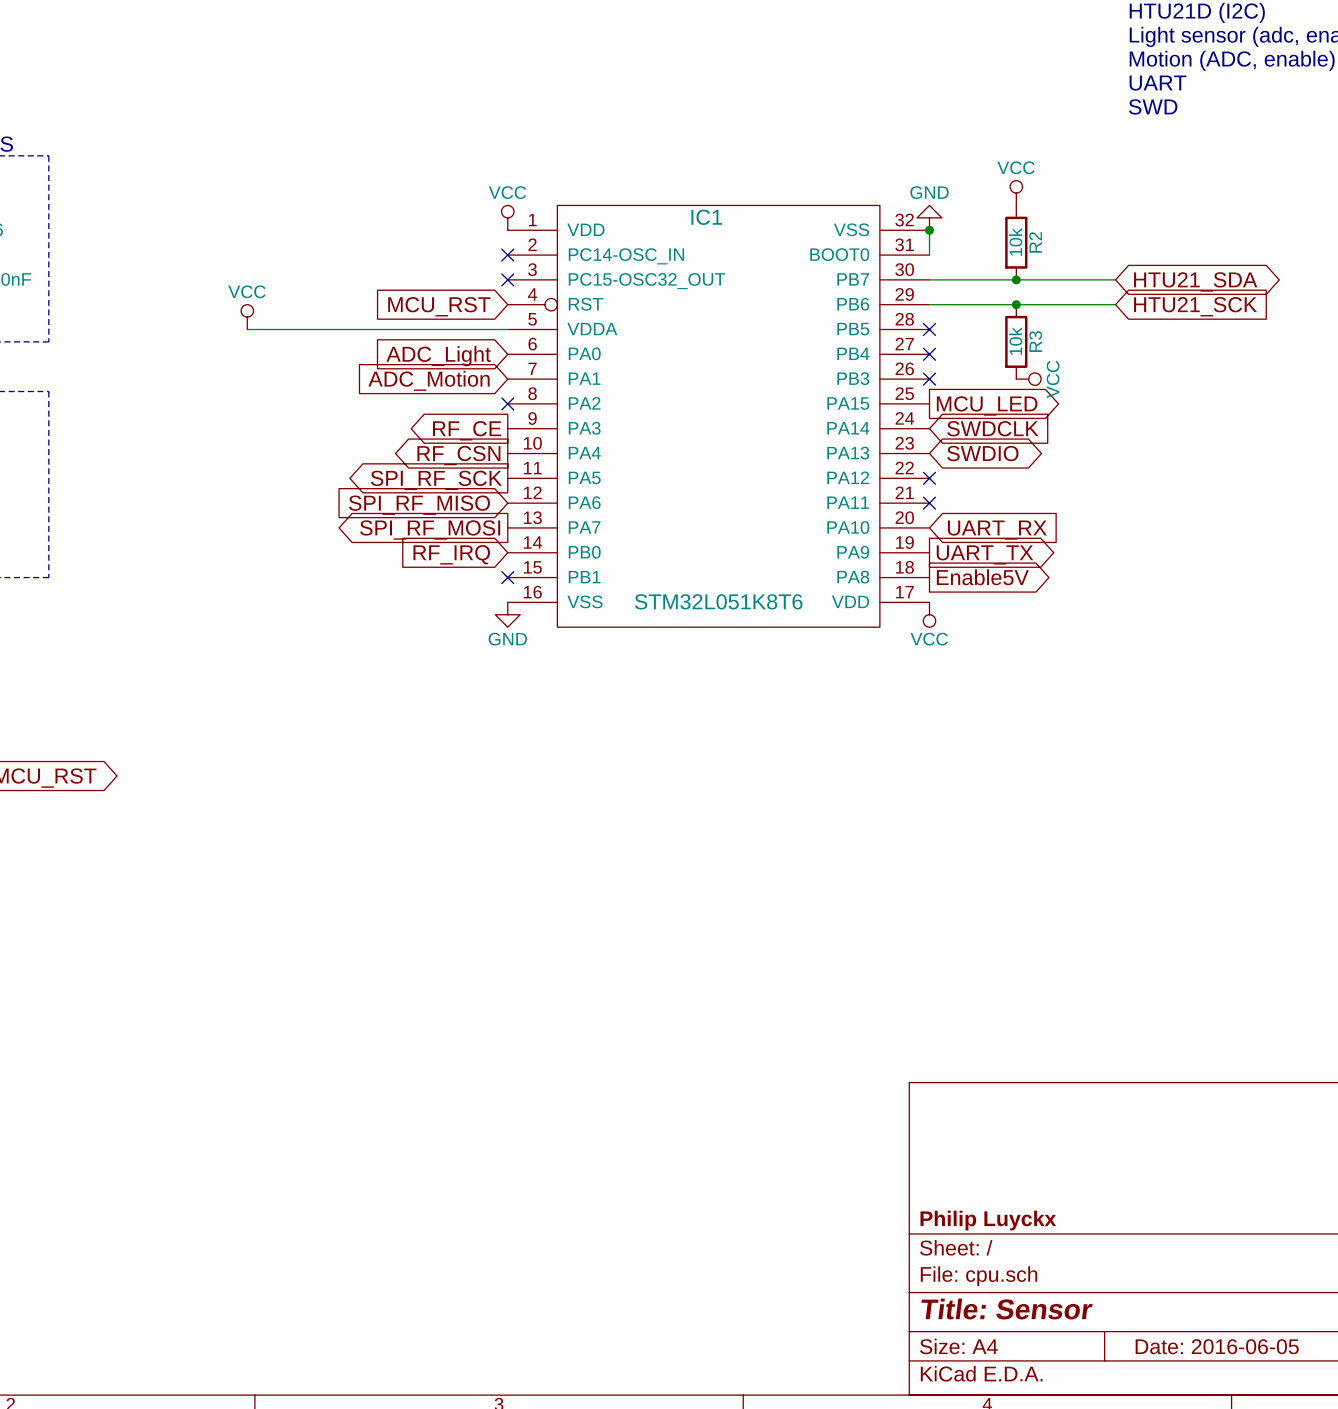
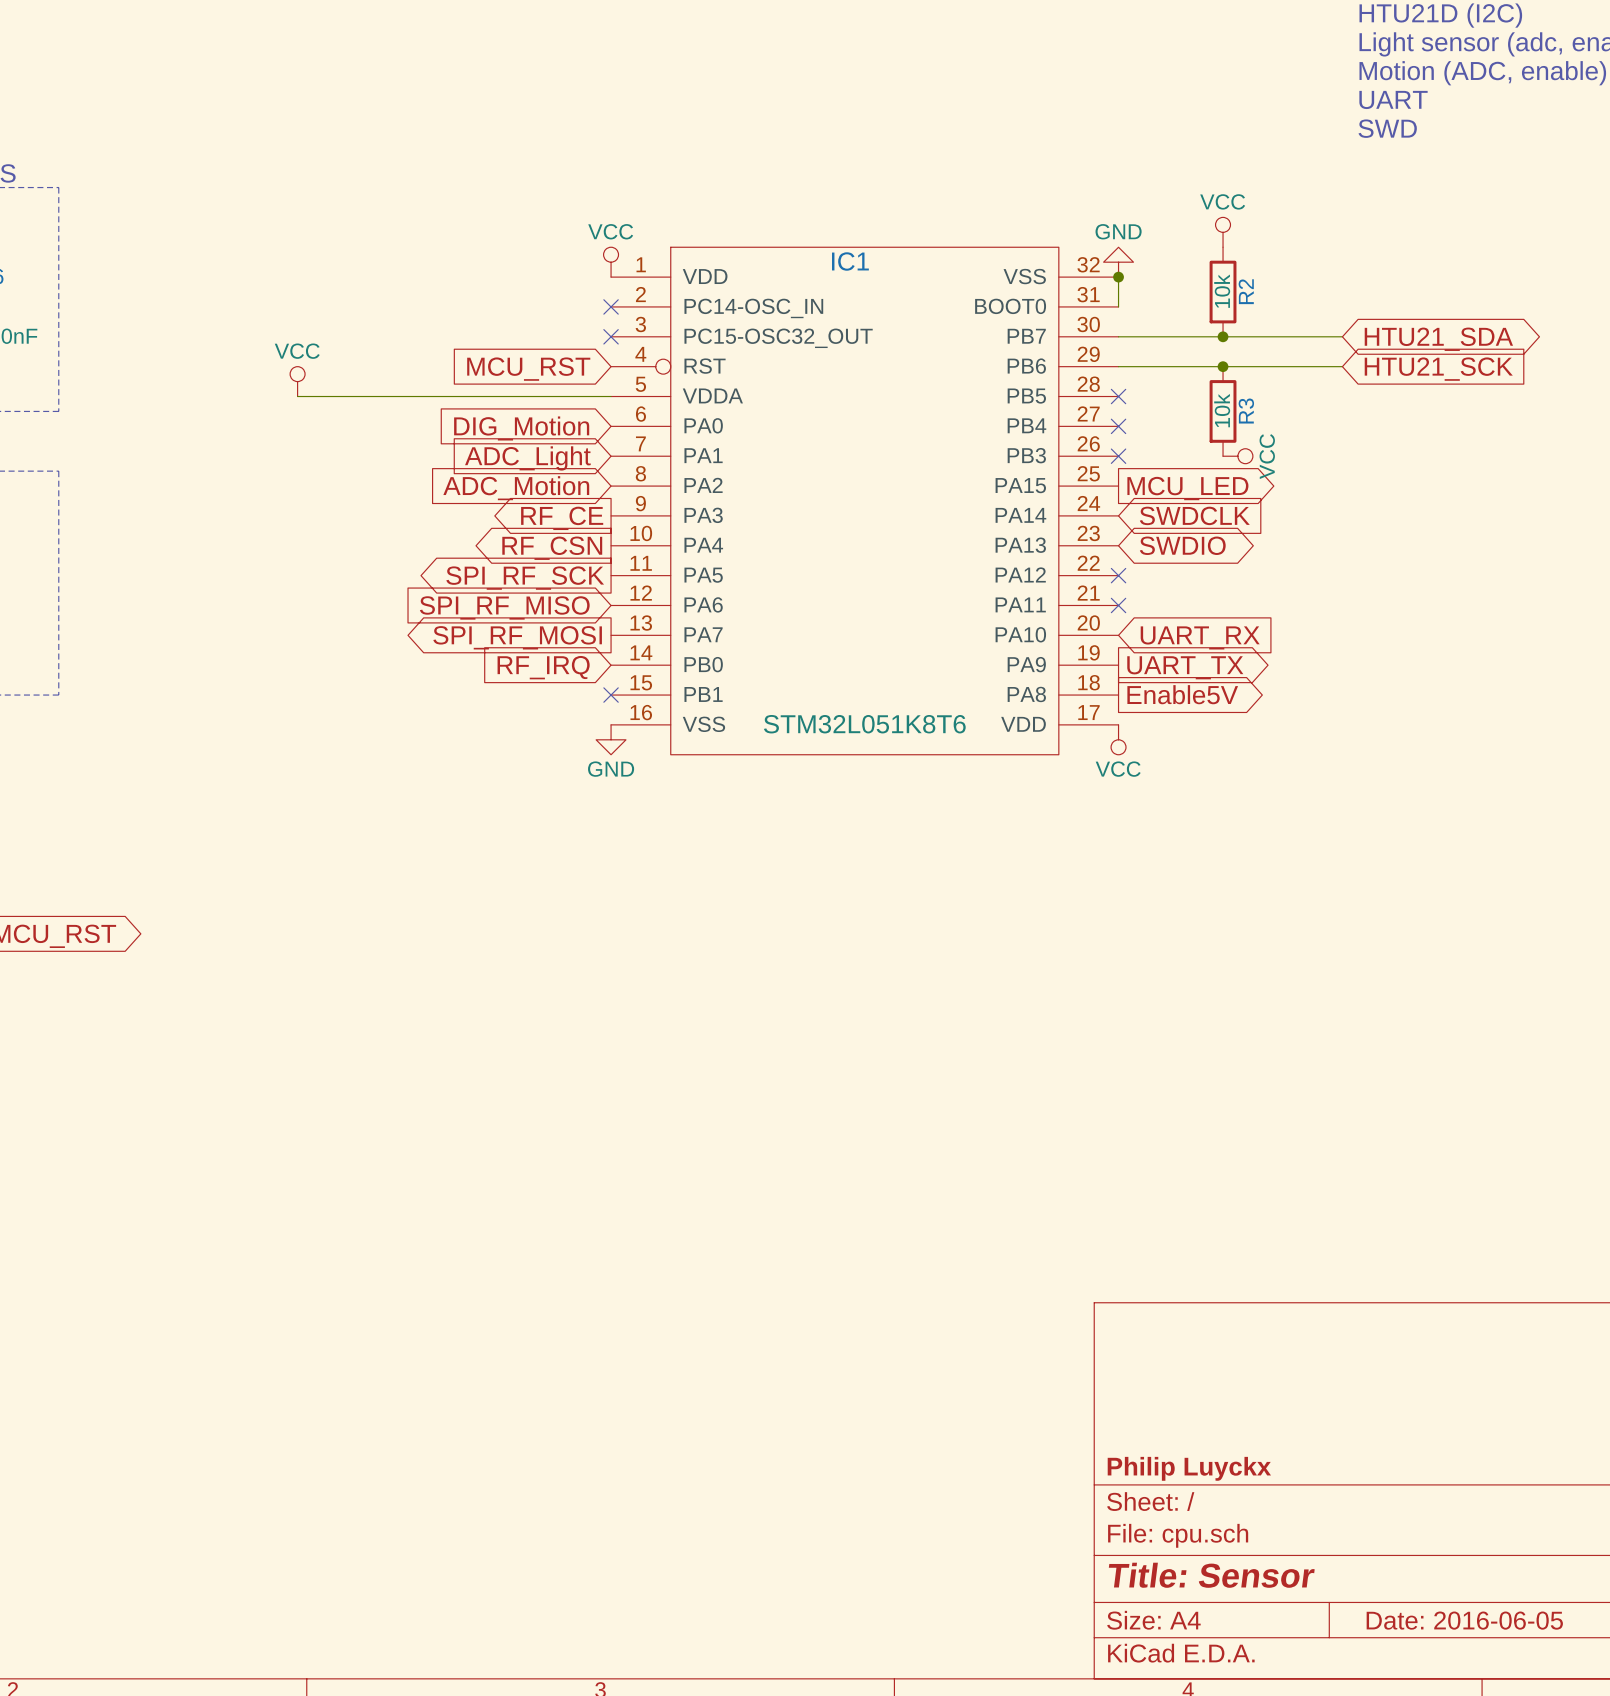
global label: ADC_Light (438, 356) -> DIG_Motion (521, 428)
global label: ADC_Motion (429, 380) -> ADC_Light (527, 458)
no-connect mark: (507, 403) -> none
global label: none -> ADC_Motion (516, 488)

